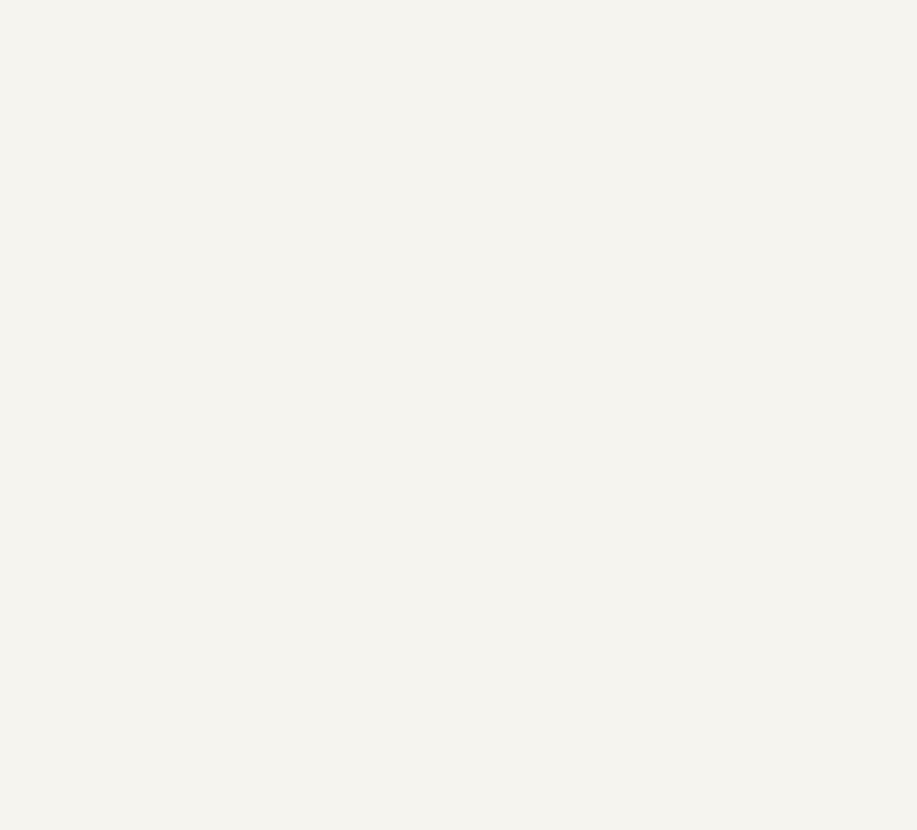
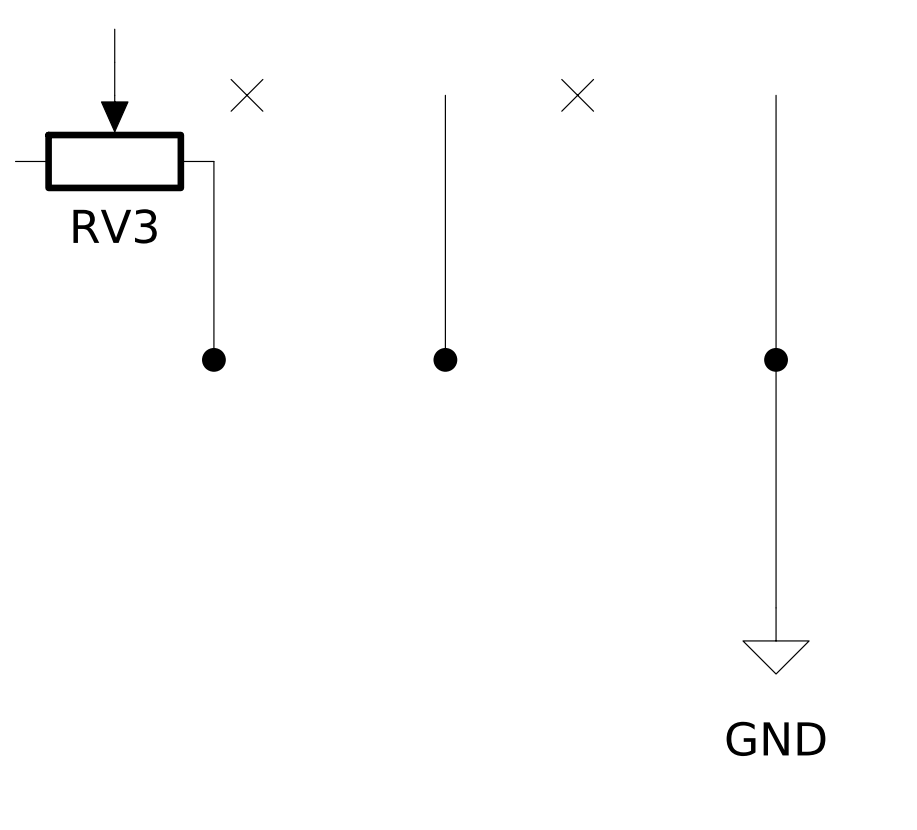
wire: none -> (114, 29) (114, 62)
no-connect mark: none -> (246, 95)
wire: none -> (445, 95) (445, 359)
no-connect mark: none -> (577, 95)
wire: none -> (776, 95) (776, 607)
RV3: none -> (114, 126)
wire: none -> (213, 161) (213, 359)
junction: none -> (213, 359)
junction: none -> (445, 359)
junction: none -> (776, 359)
power symbol: none -> GND (776, 640)

